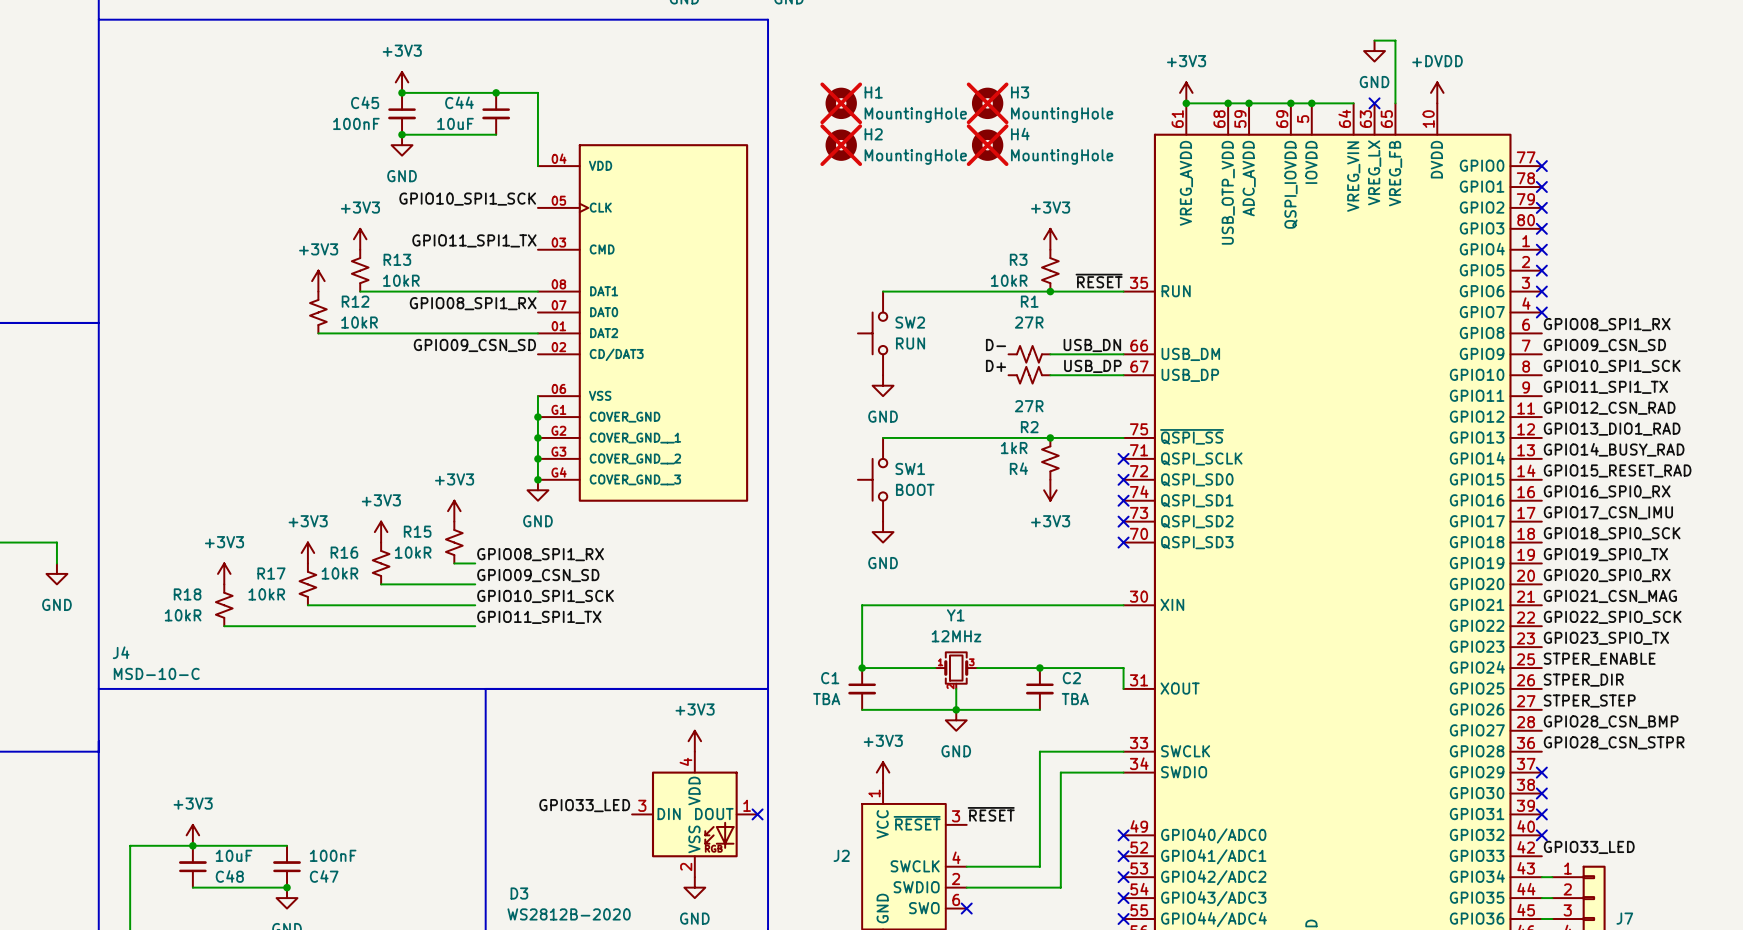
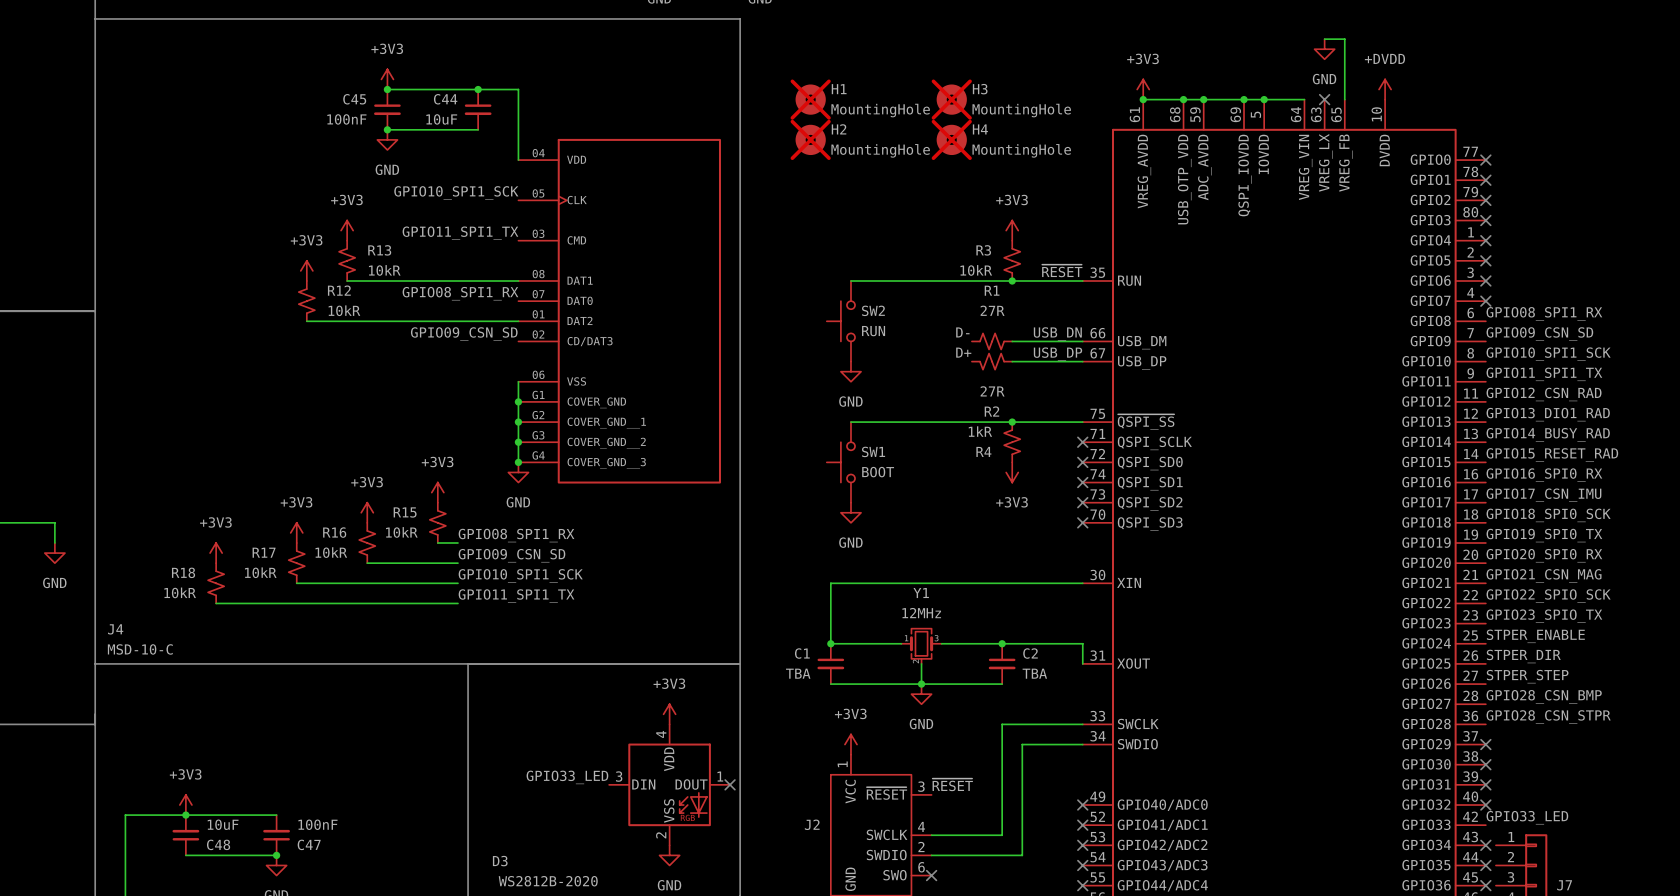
wire: (1541, 877) (1552, 877) -> none
no-connect mark: none -> (1485, 845)
wire: (1541, 898) (1552, 898) -> none
no-connect mark: none -> (1485, 865)
wire: (1541, 919) (1552, 919) -> none
no-connect mark: none -> (1485, 885)

